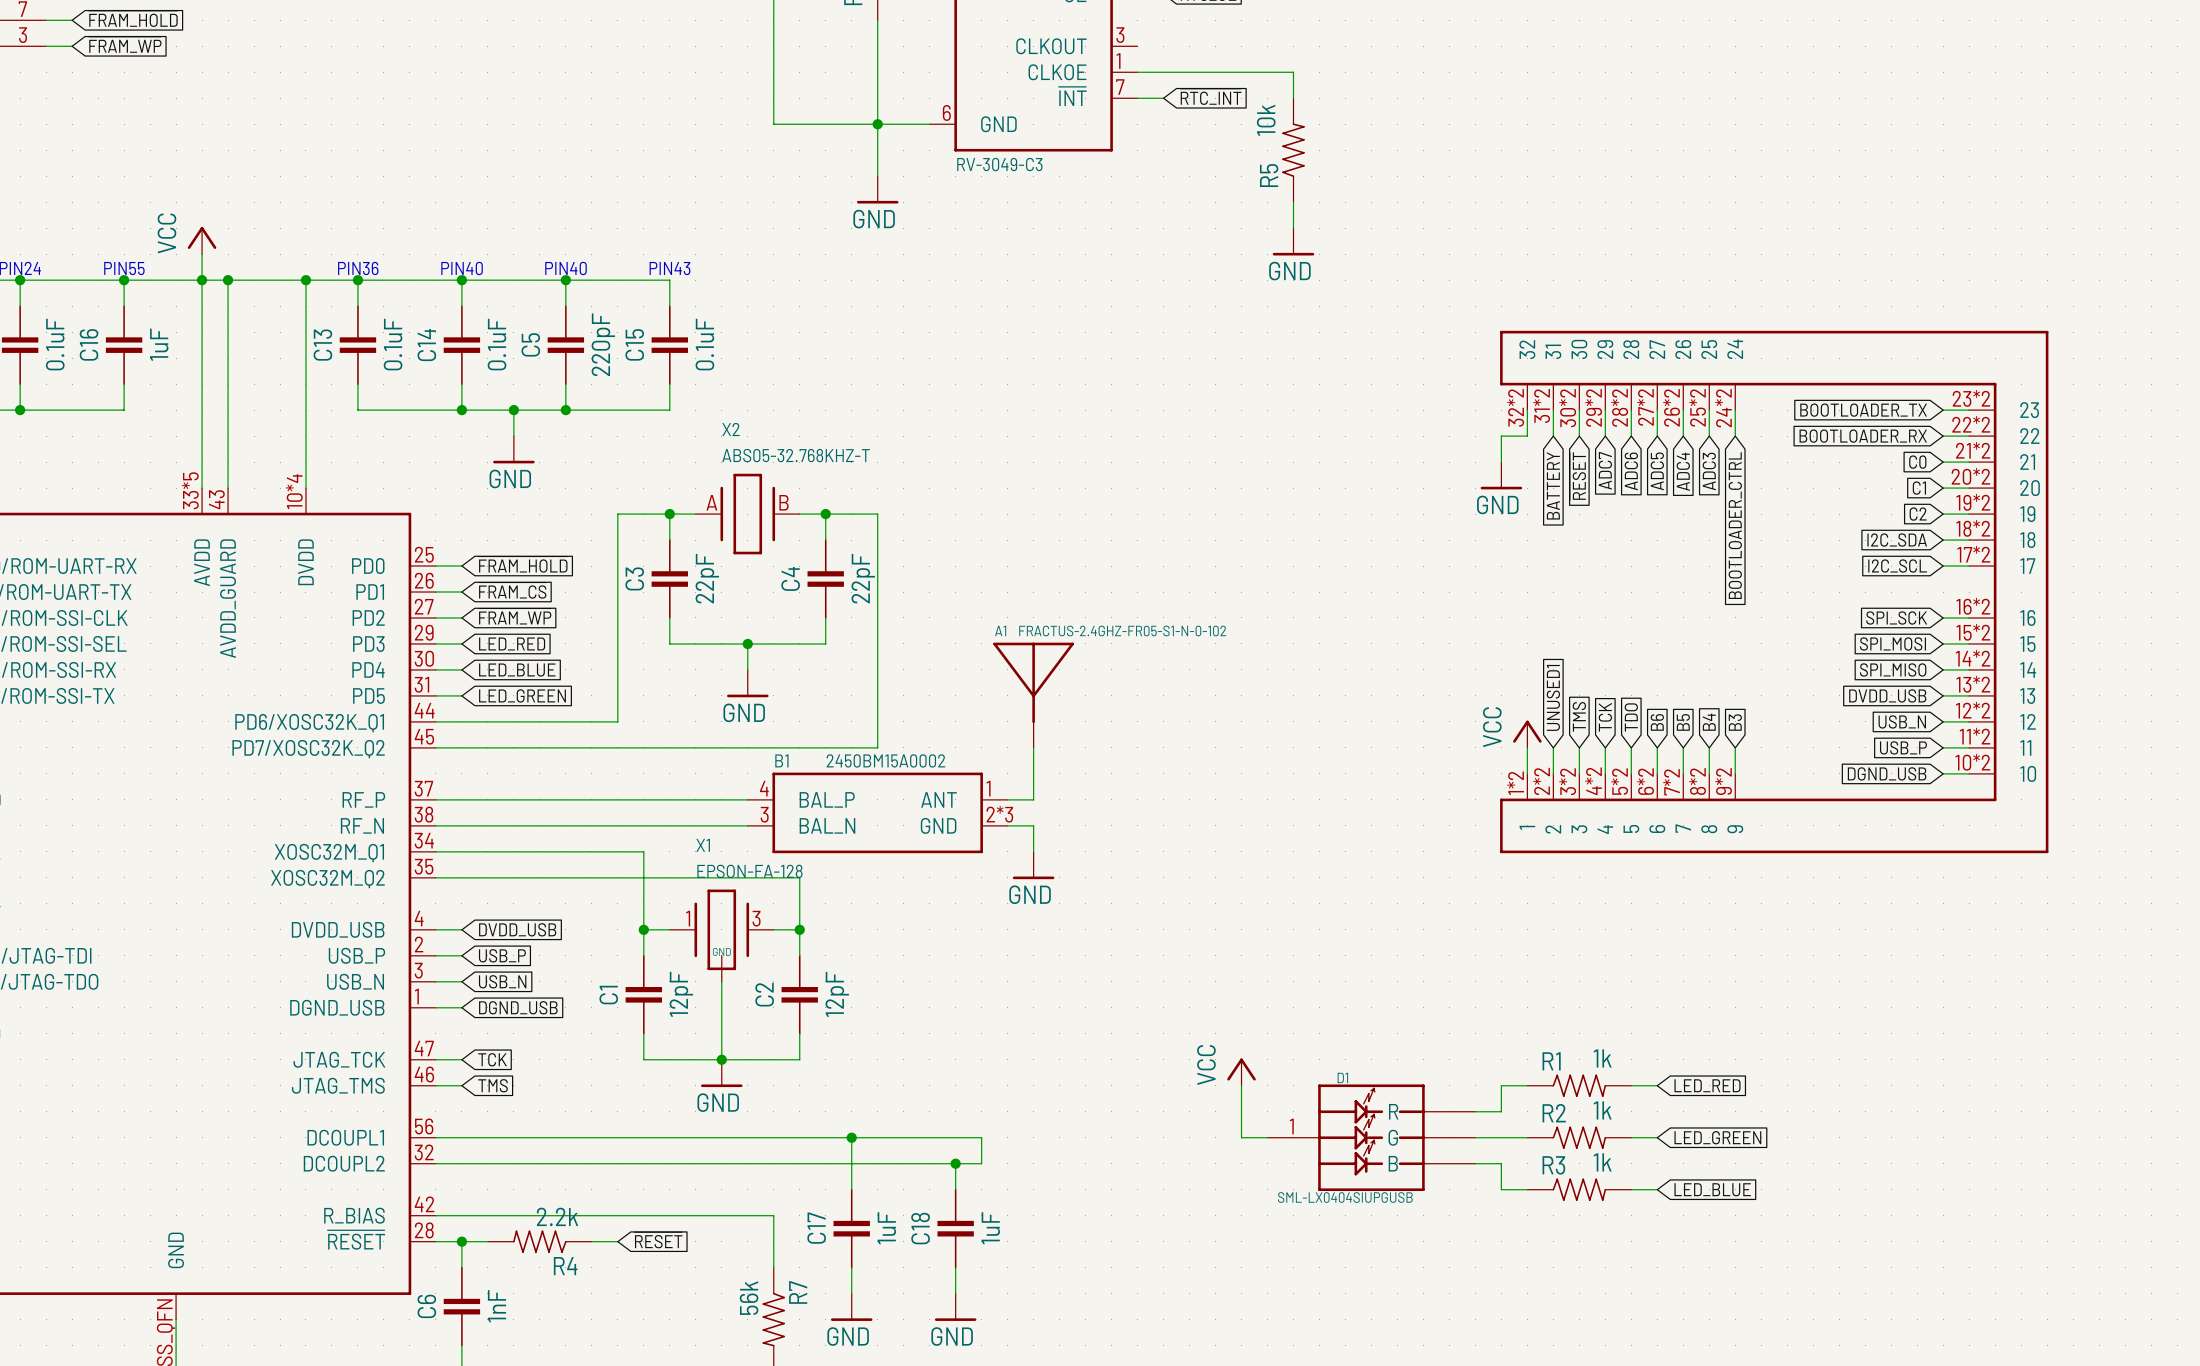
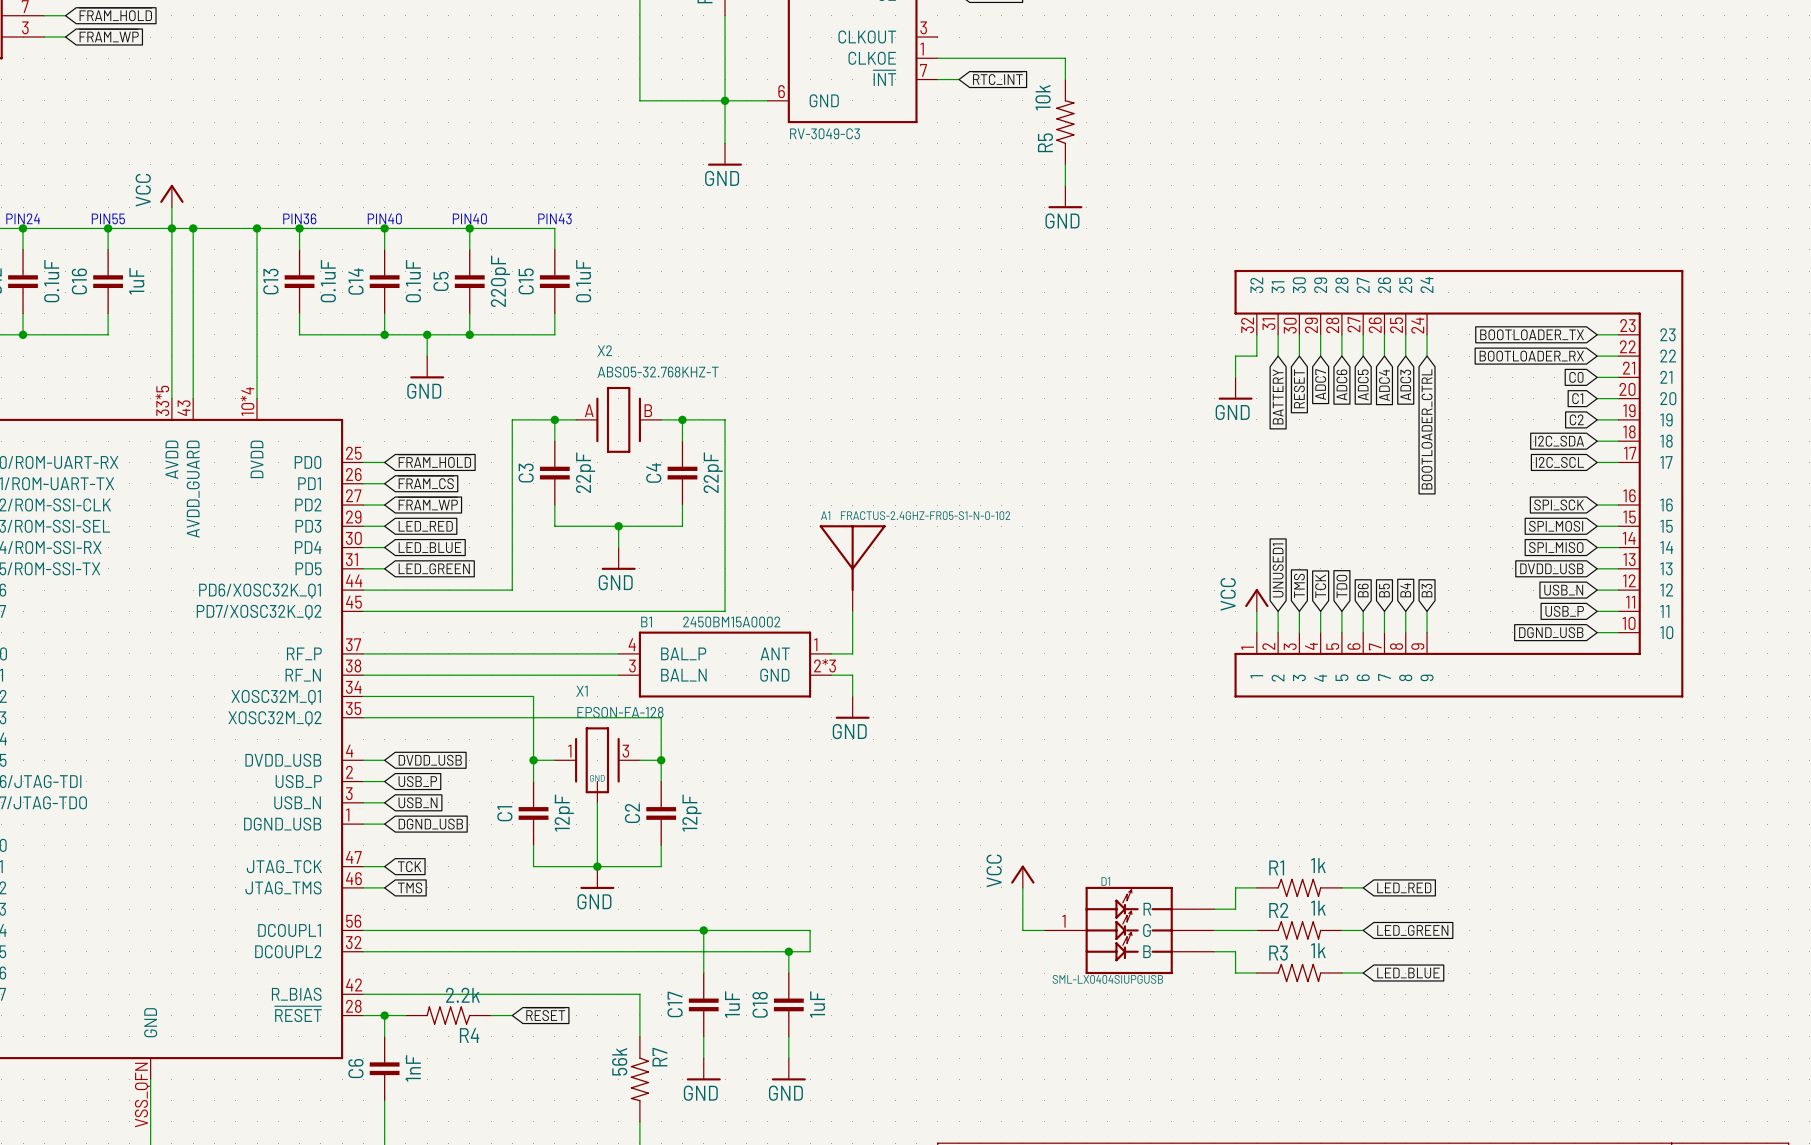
part symbol: [1500, 330, 2049, 854] -> [1234, 269, 1684, 698]

